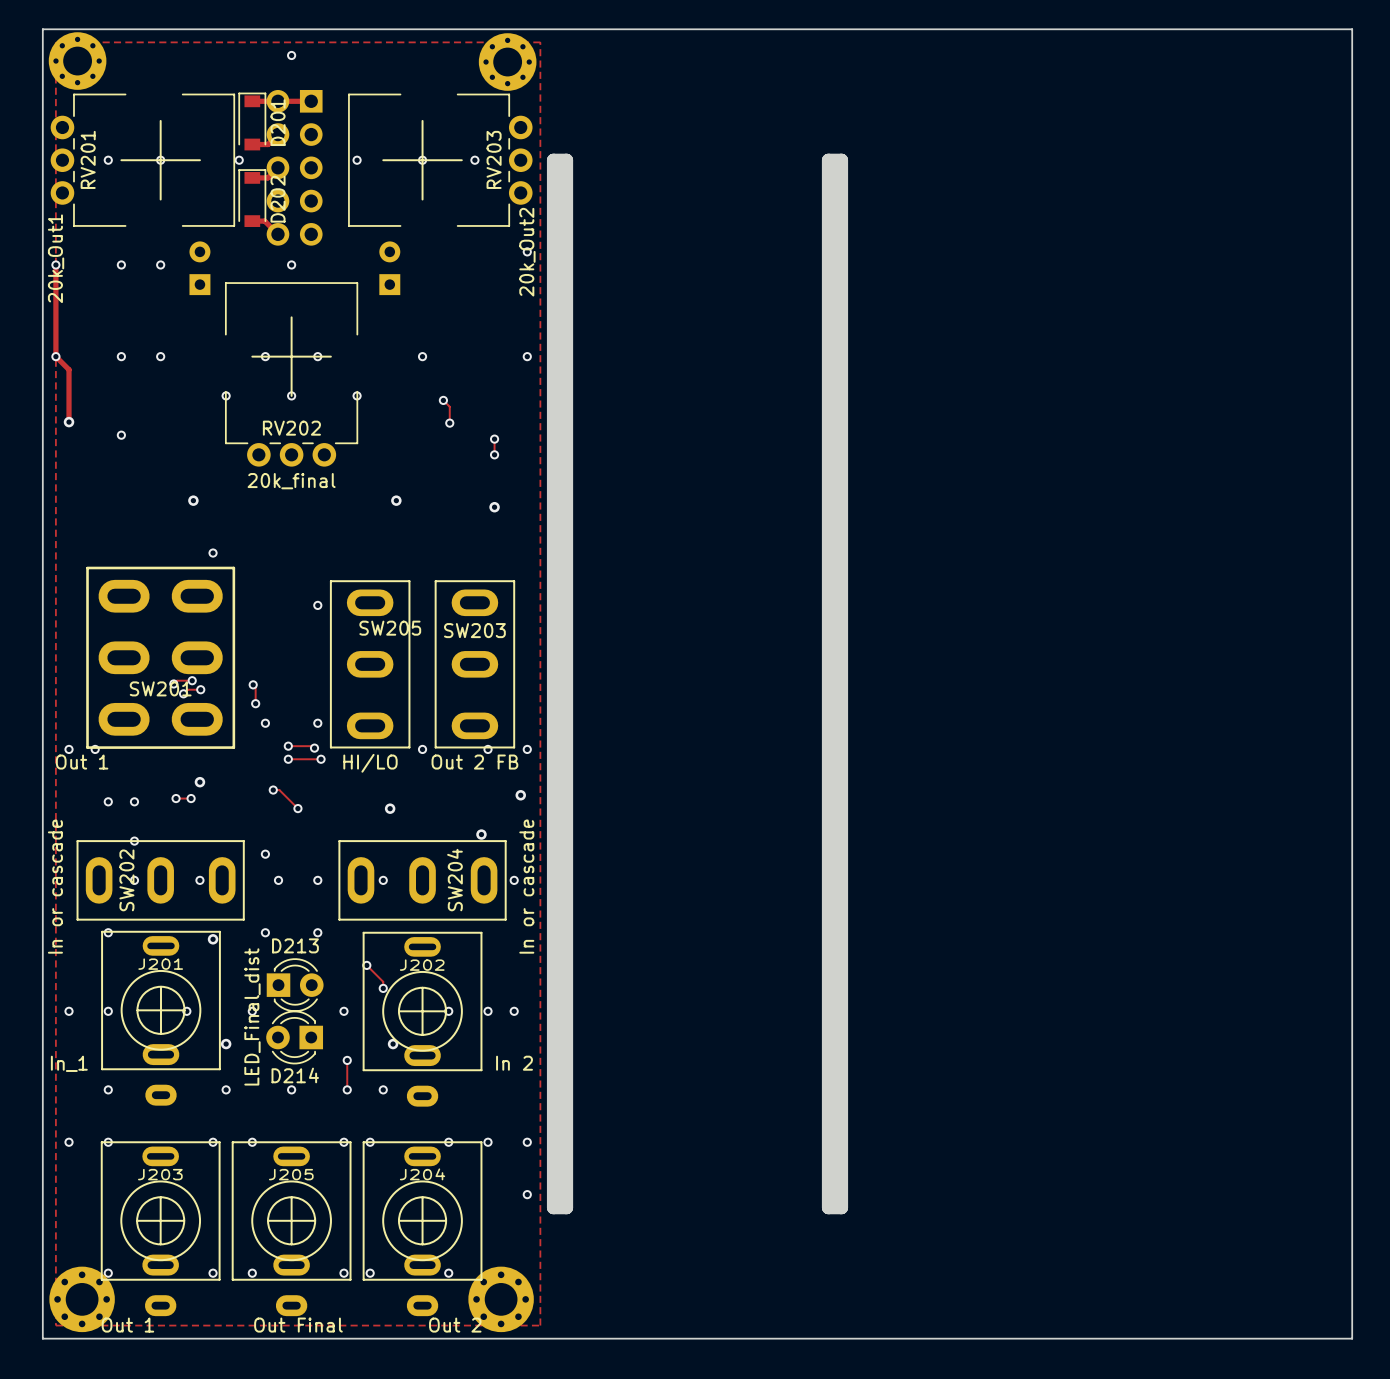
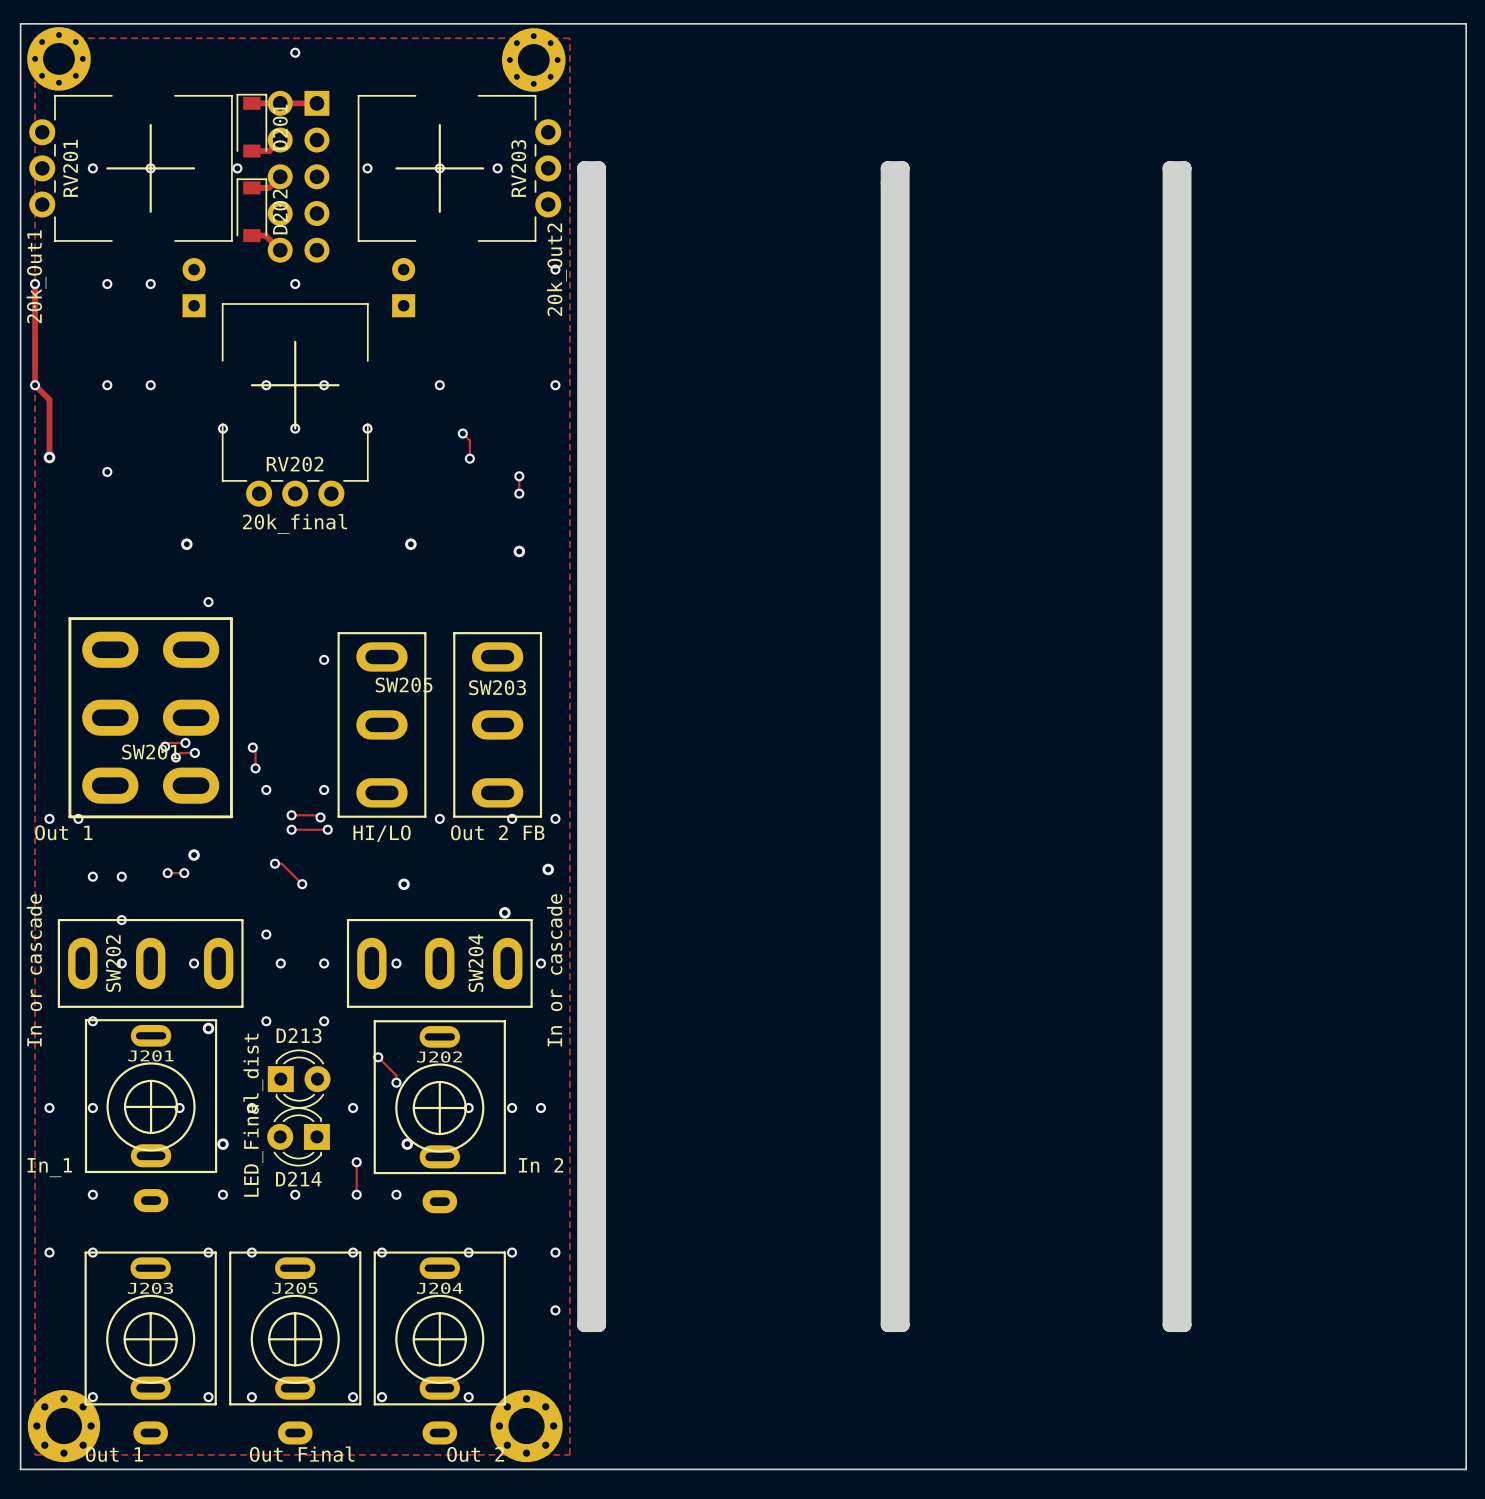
board edge: none -> (1169, 168) (1169, 1324) (1184, 1324) (1184, 168) (1169, 168)

